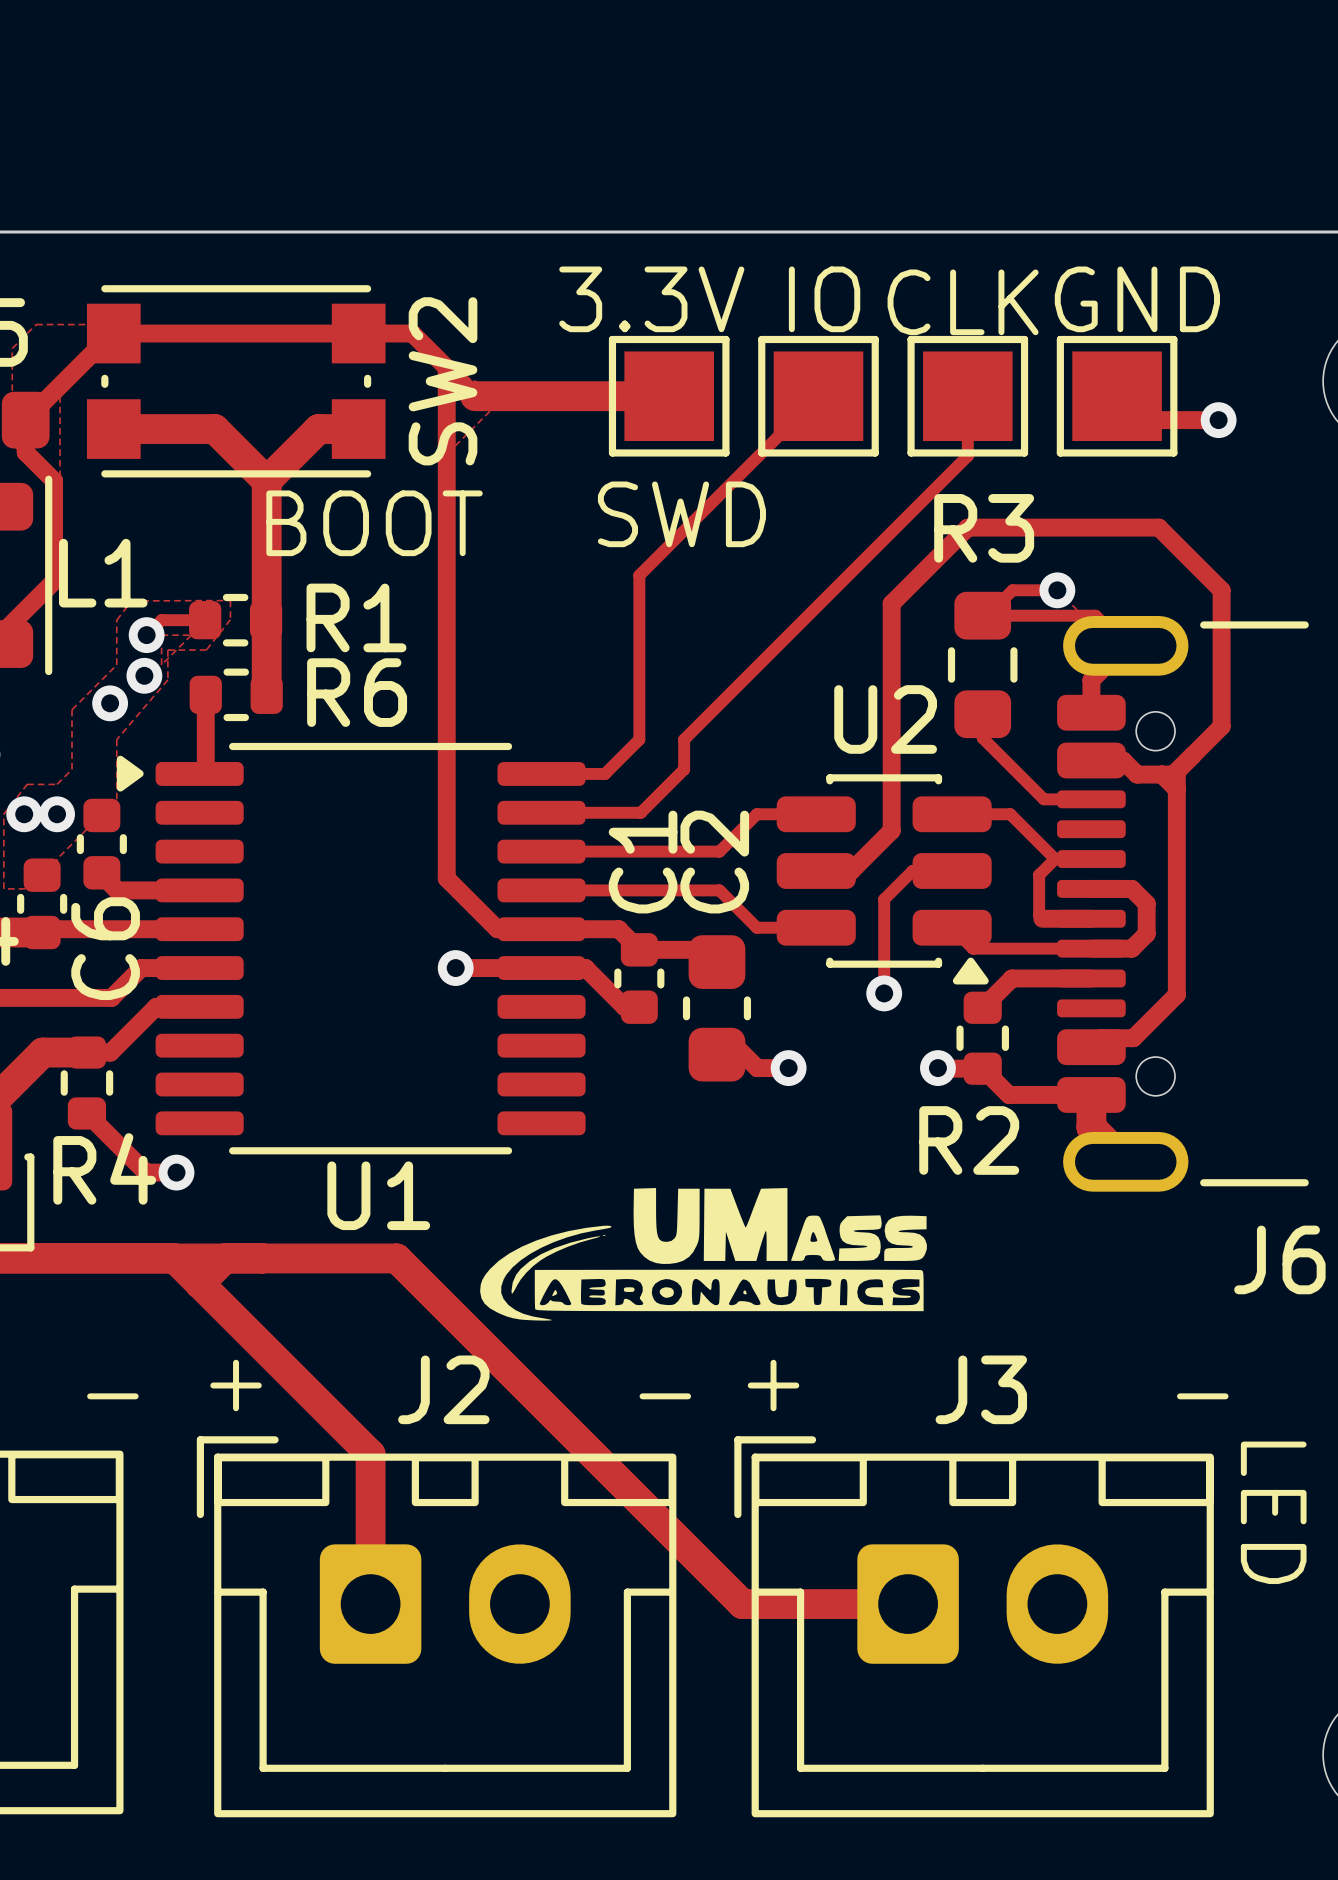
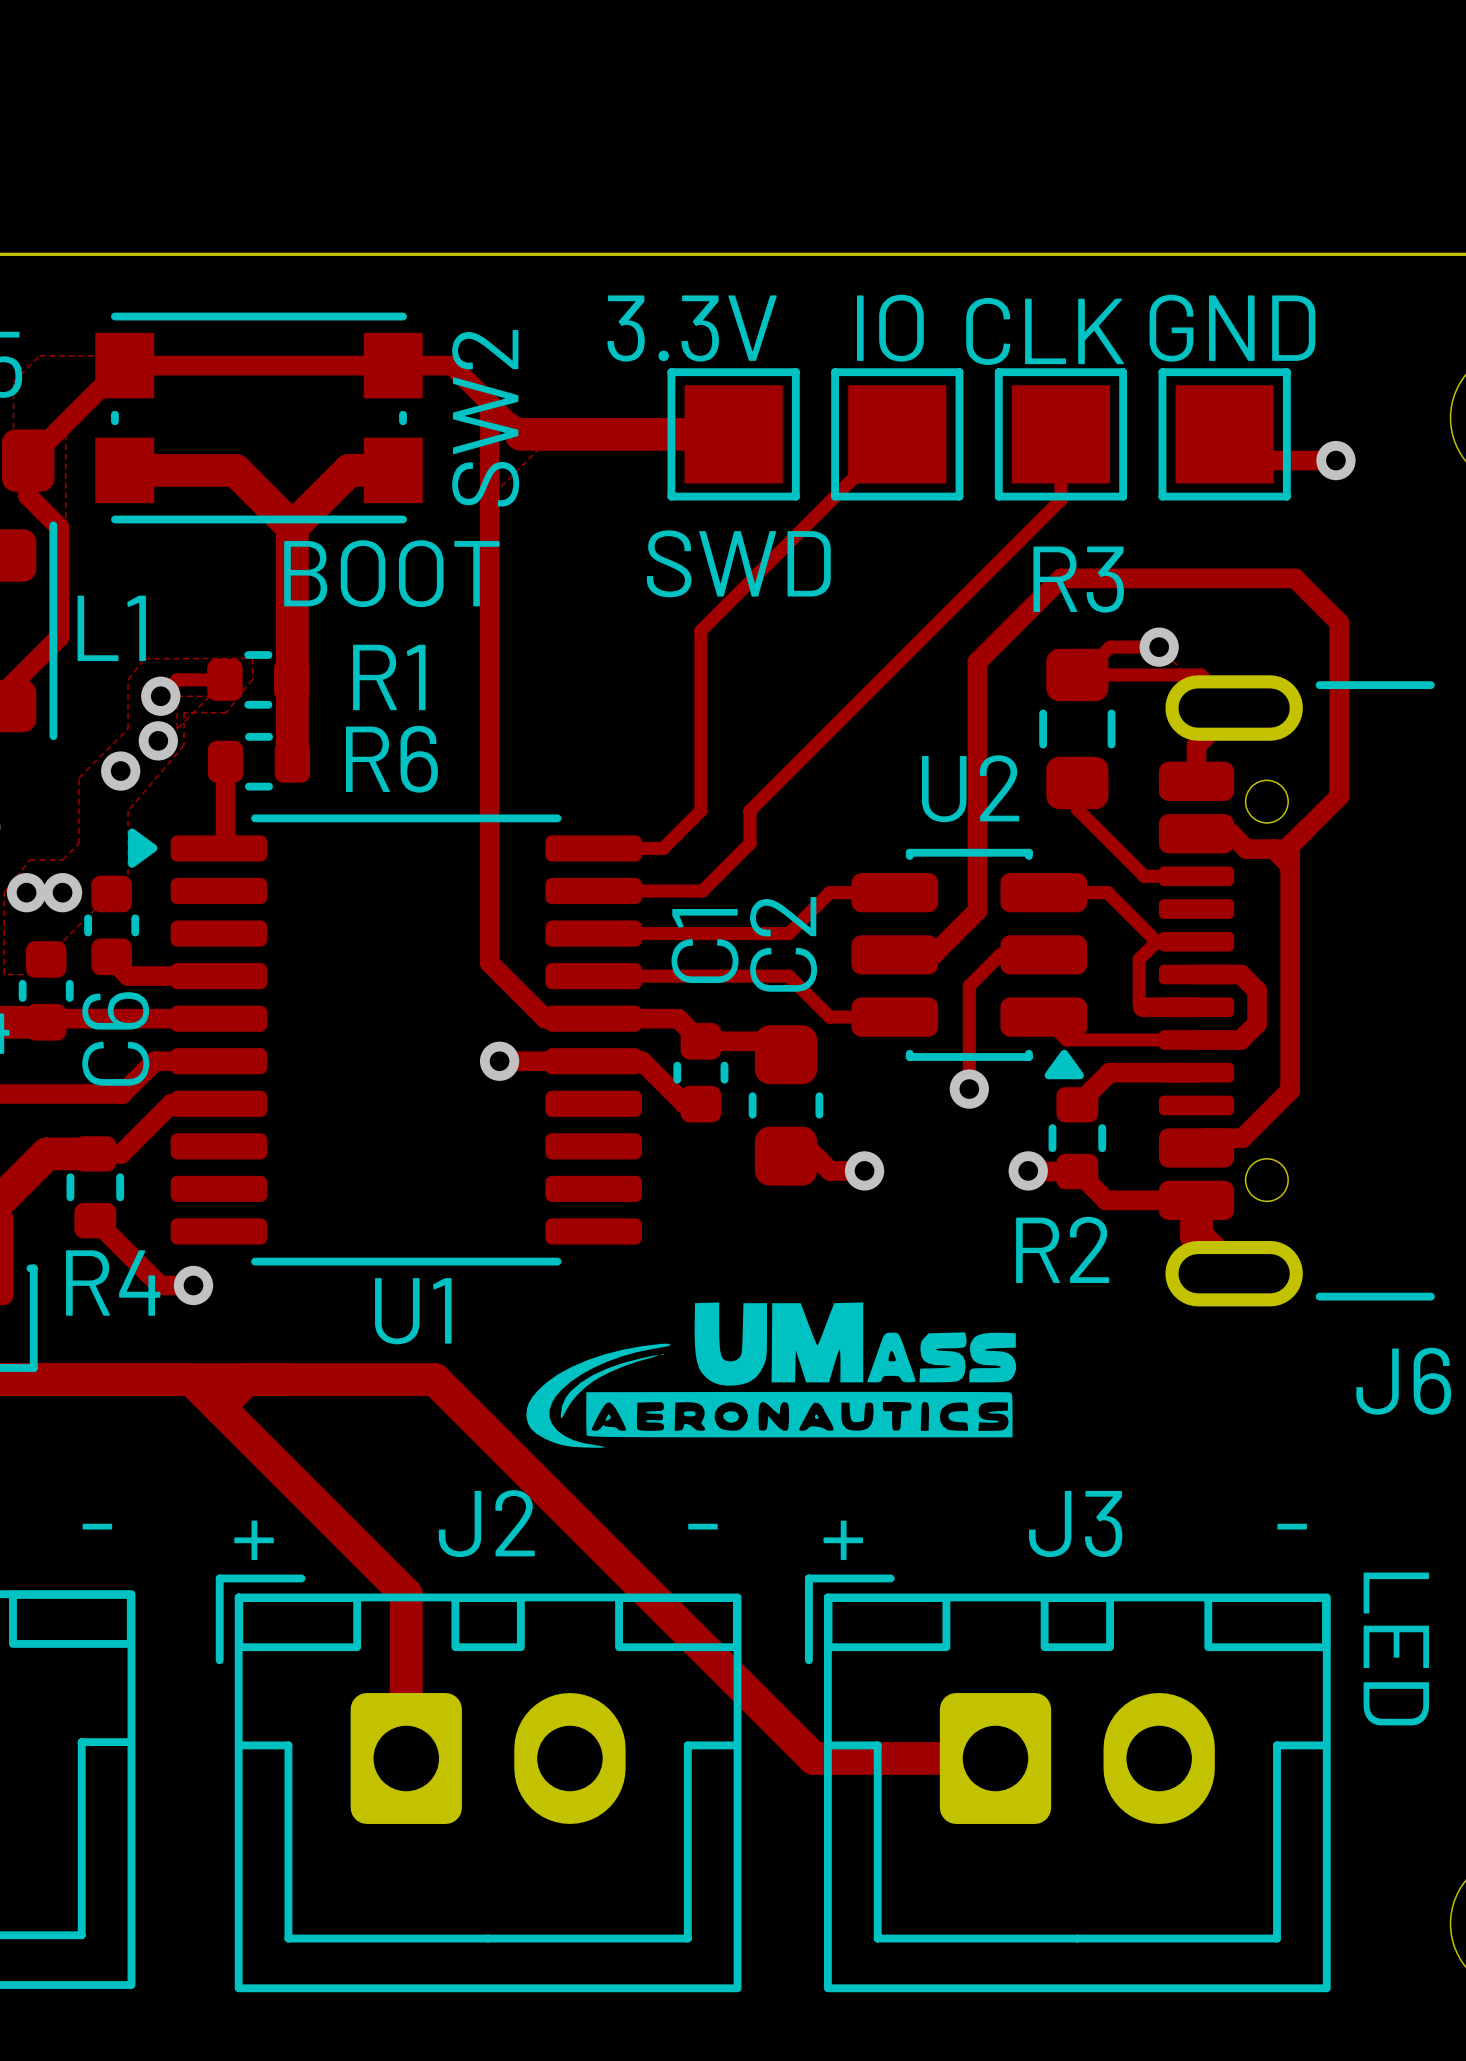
track: (1158, 527) (1221, 590) -> (1270, 578) (1295, 578) (1339, 622) (1339, 647)

